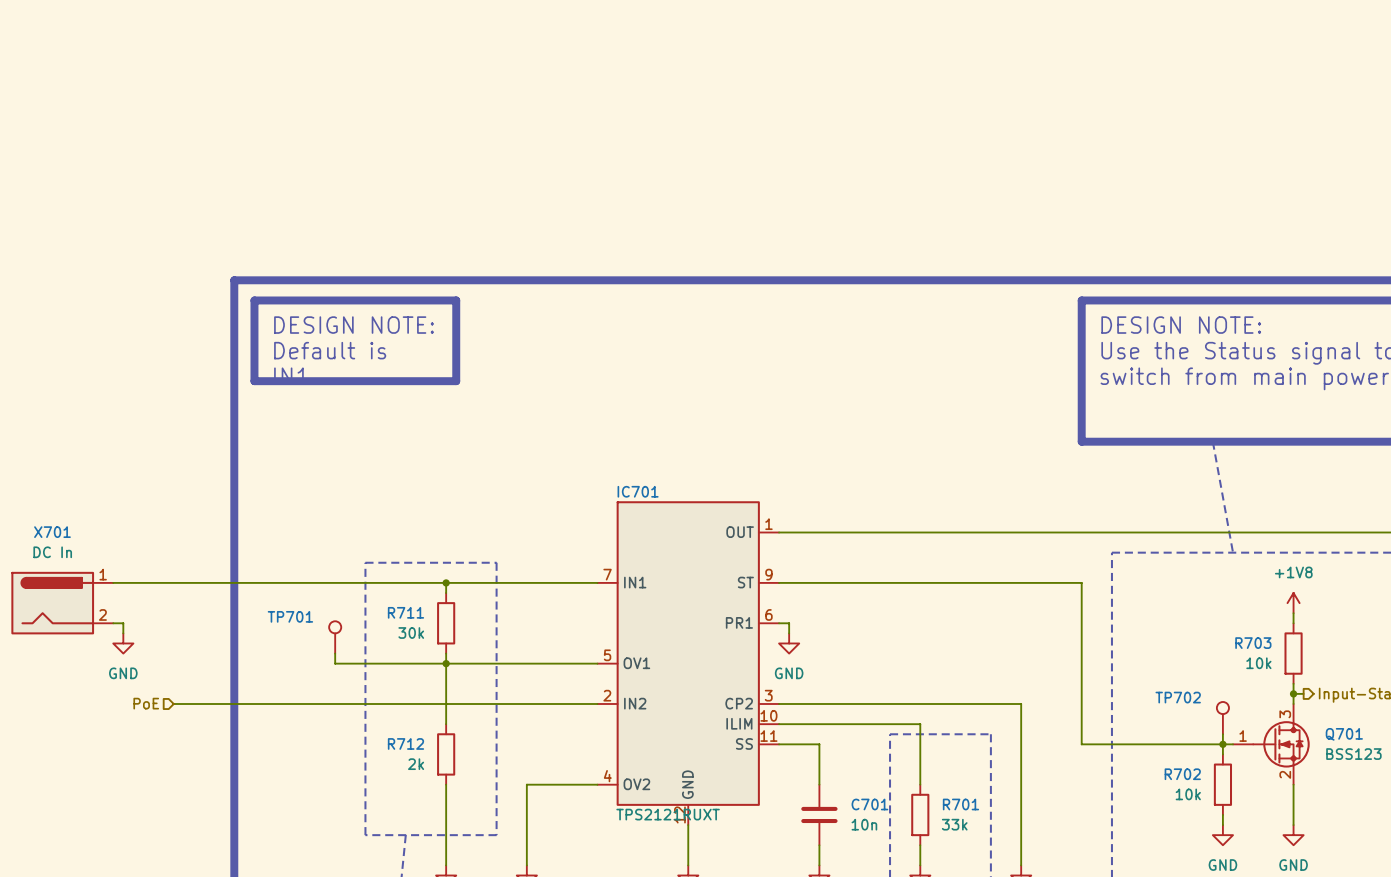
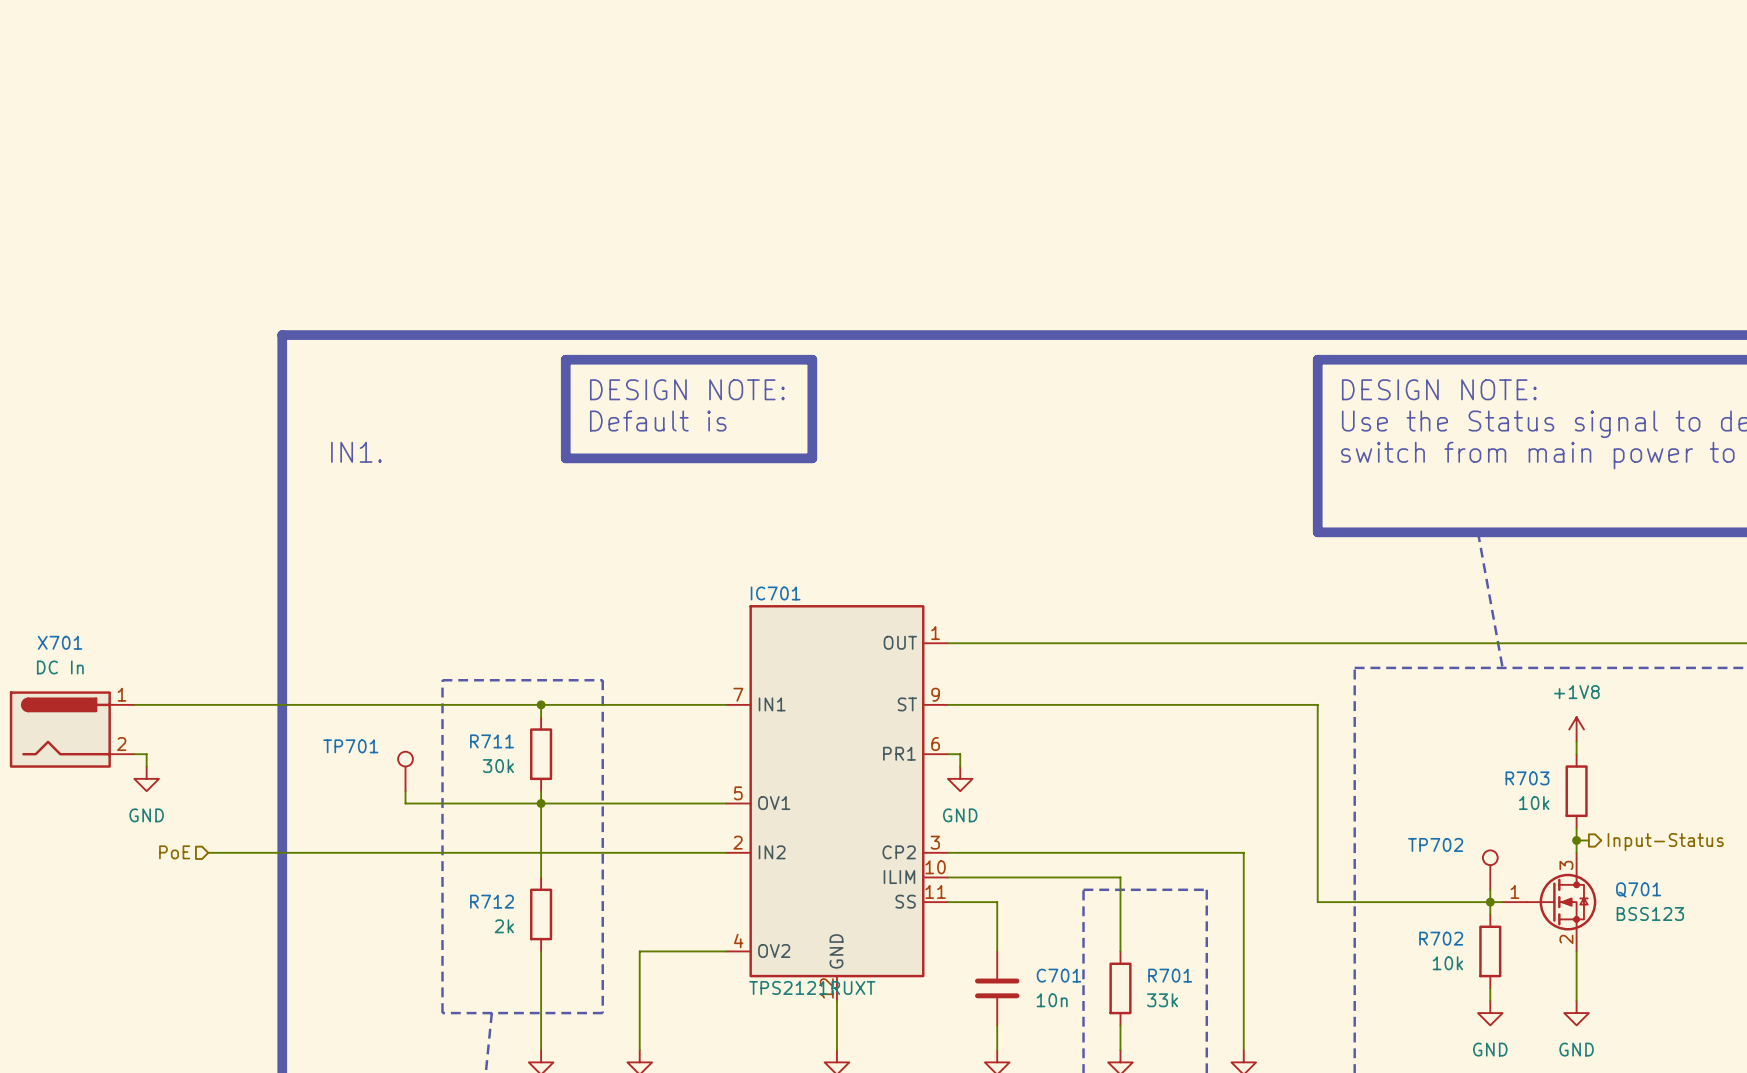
line: (254, 300) (456, 300) (456, 381) (254, 381) (254, 300) -> none
line: none -> (565, 359) (812, 359) (812, 458) (565, 458) (565, 359)
text: DESIGN NOTE: (353, 325) -> none
text: none -> DESIGN NOTE: (687, 389)
text: Default is (330, 350) -> none
text: none -> Default is (658, 421)

